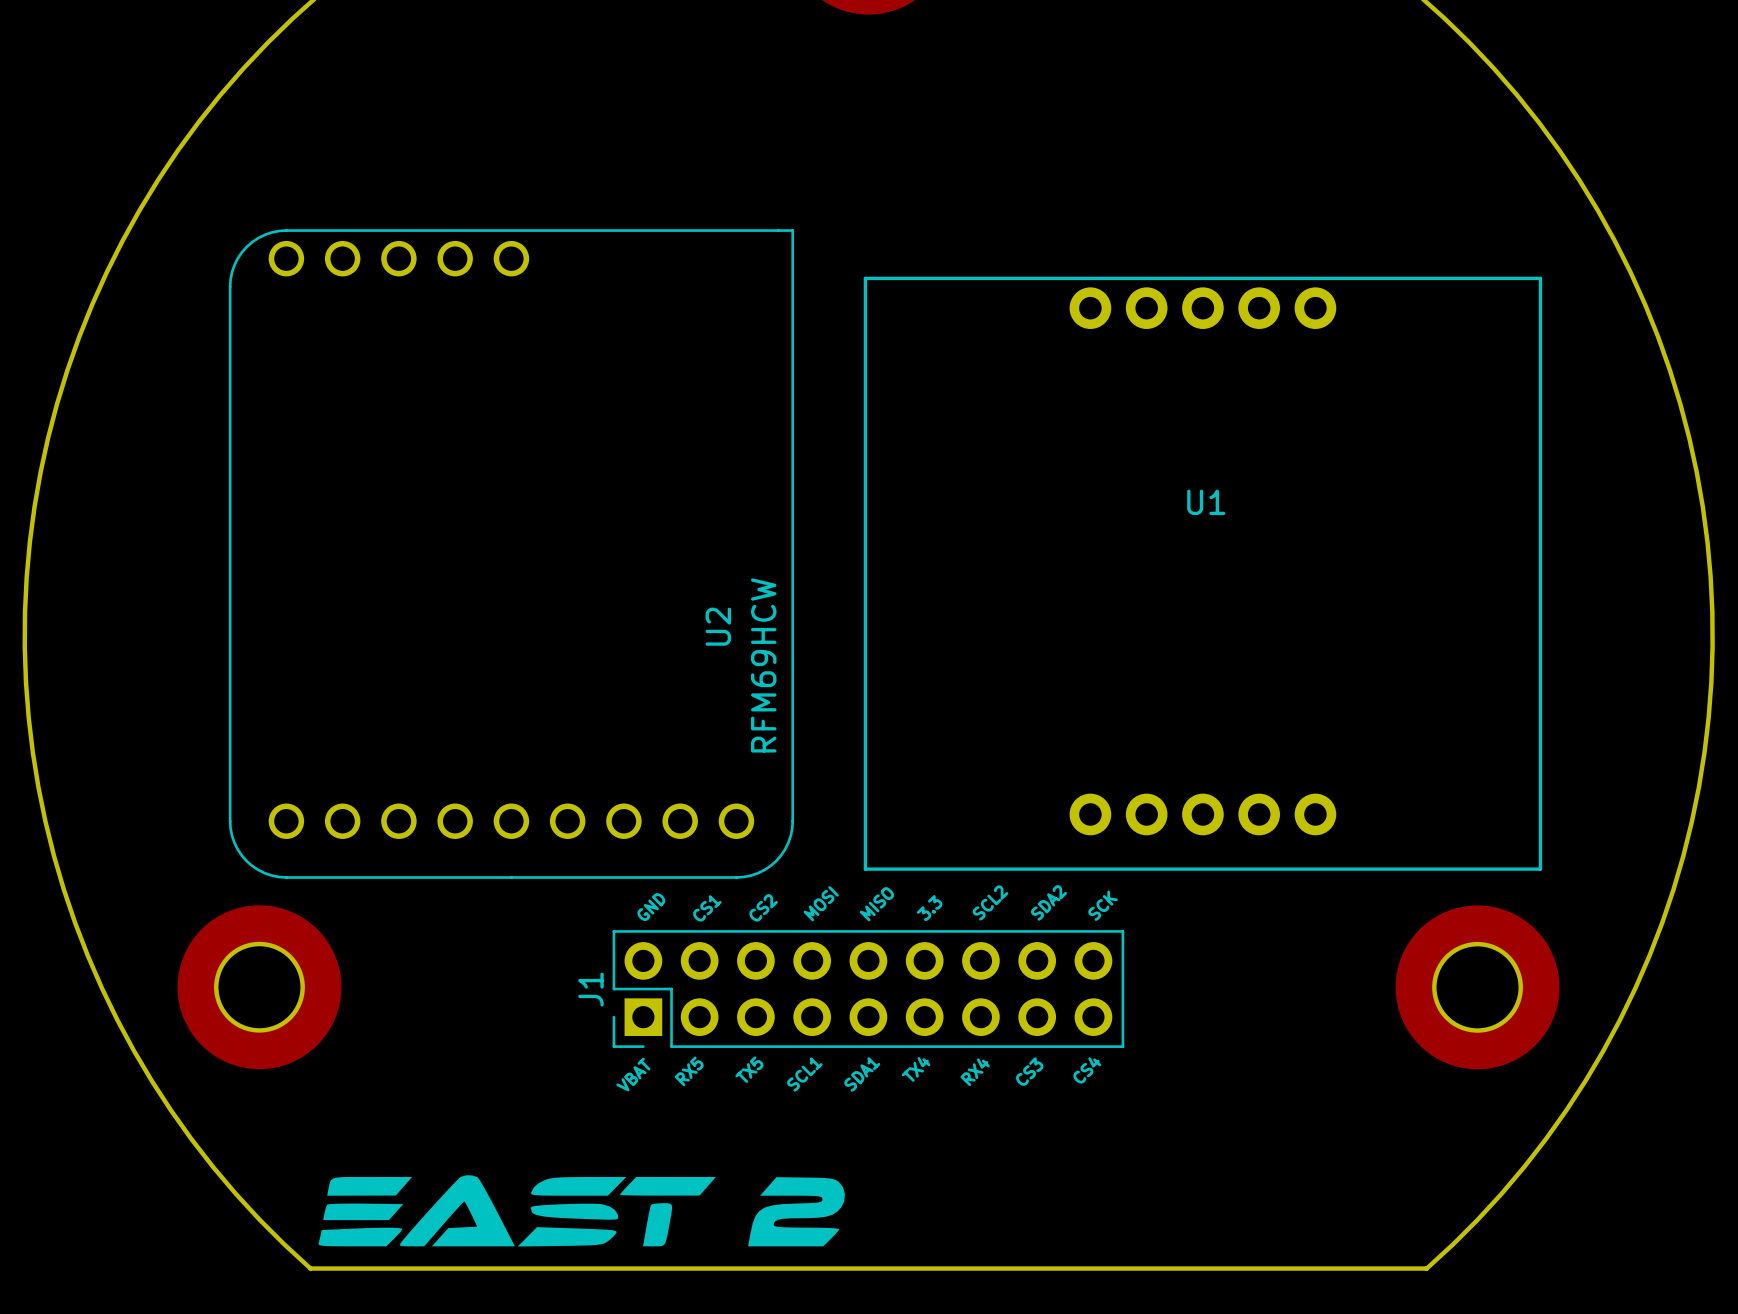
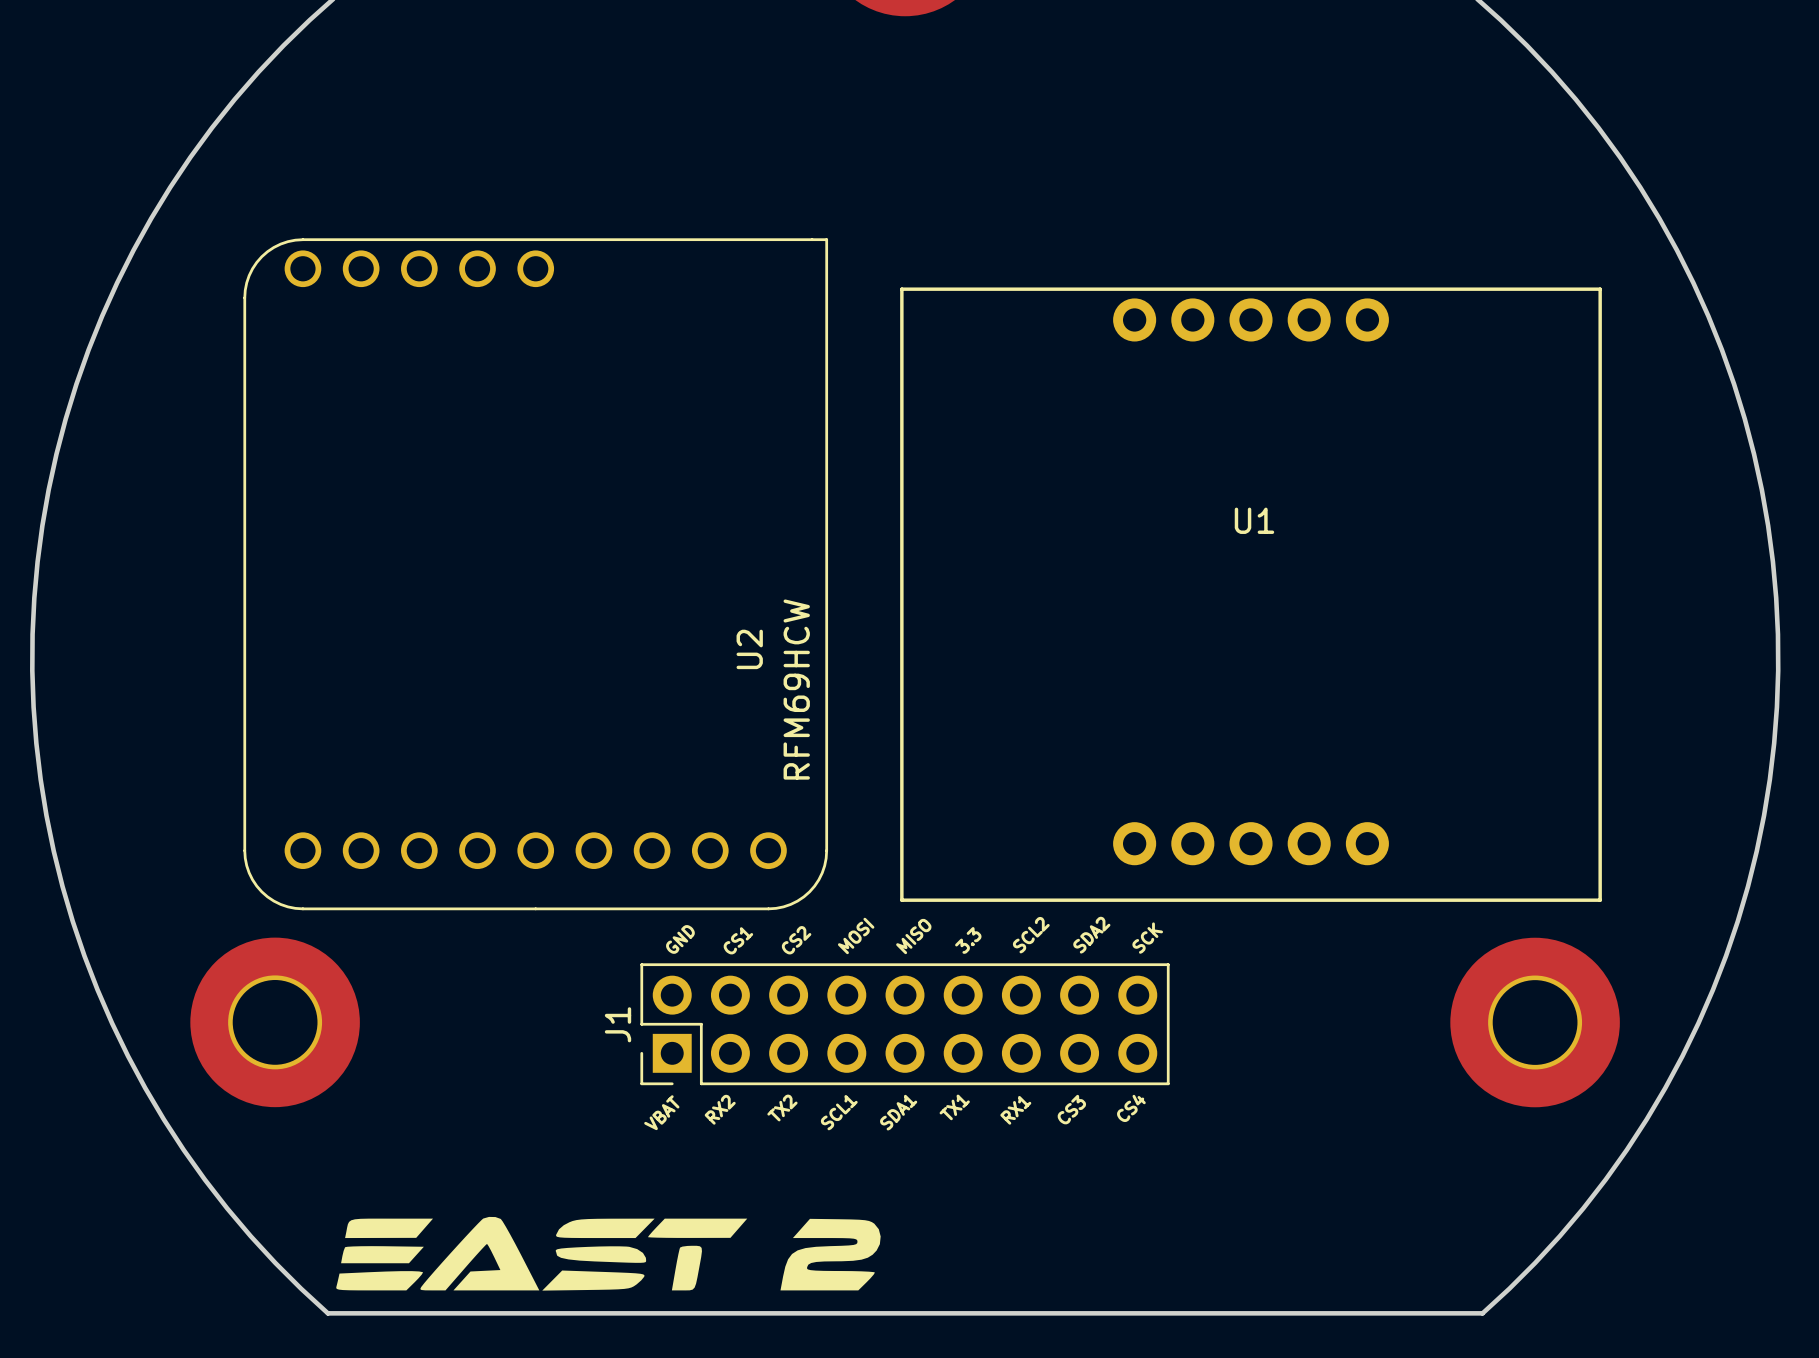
text: TX5 (749, 1069) -> TX2 (782, 1108)
text: TX4 (916, 1069) -> TX1 (954, 1107)
text: RX5 (689, 1071) -> RX2 (720, 1109)
text: RX4 (975, 1072) -> RX1 (1015, 1110)

